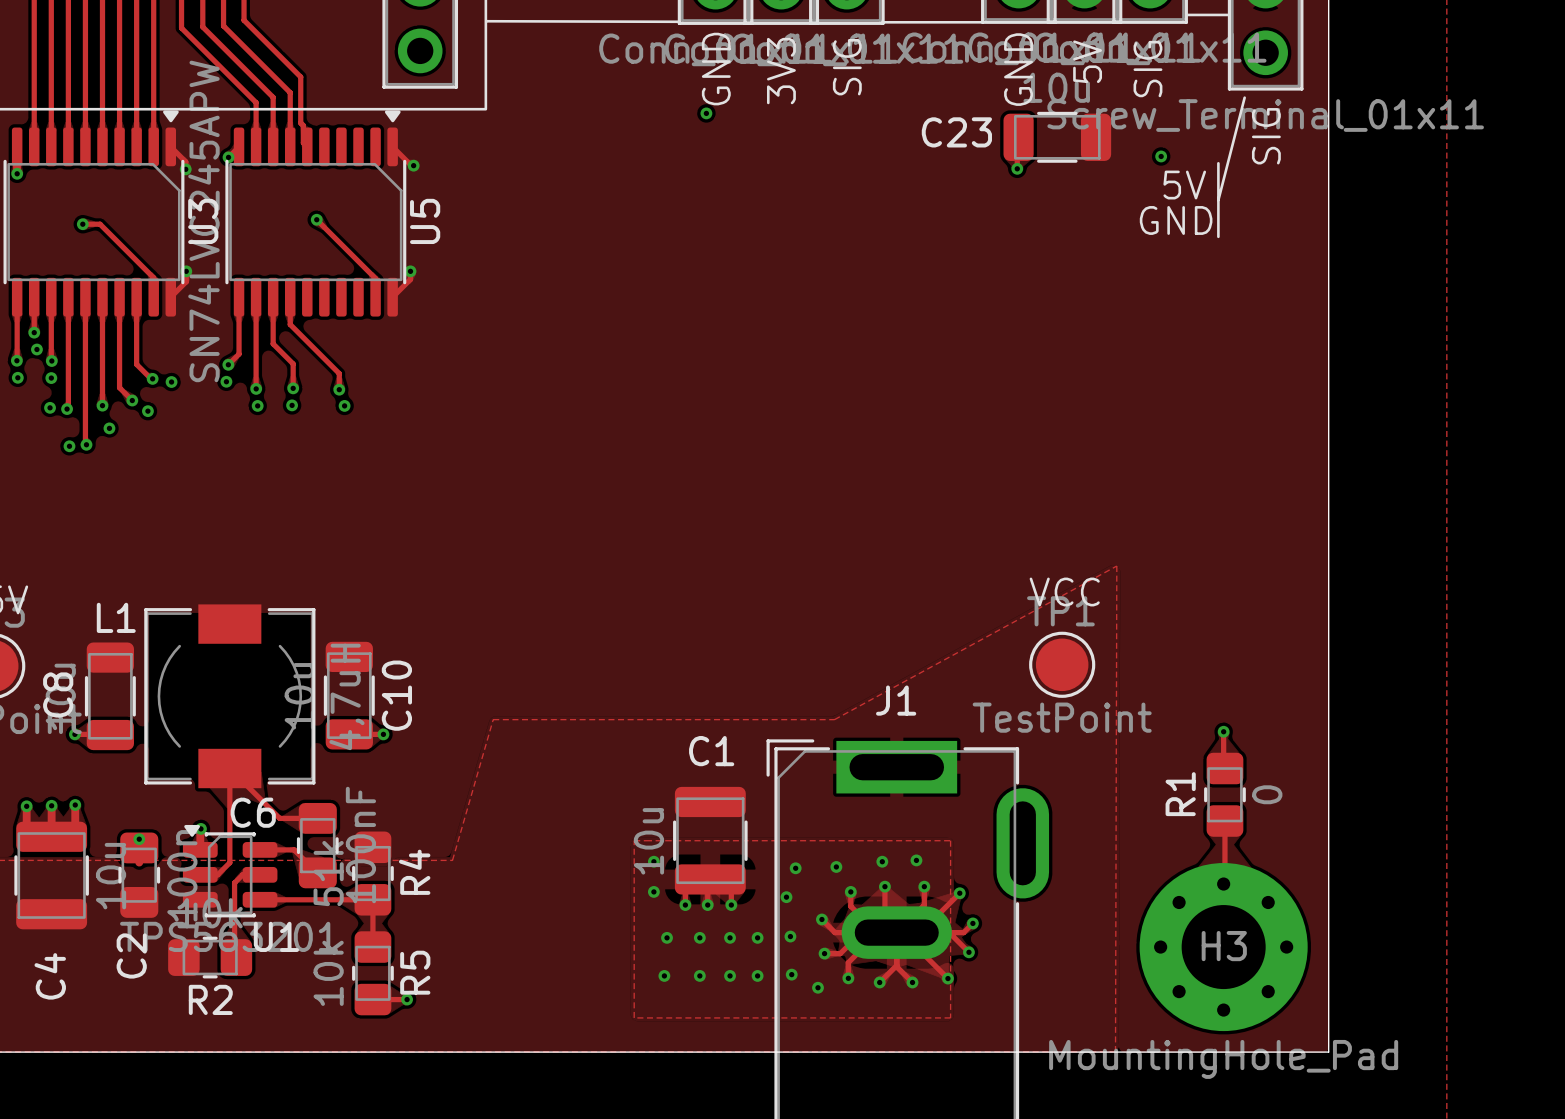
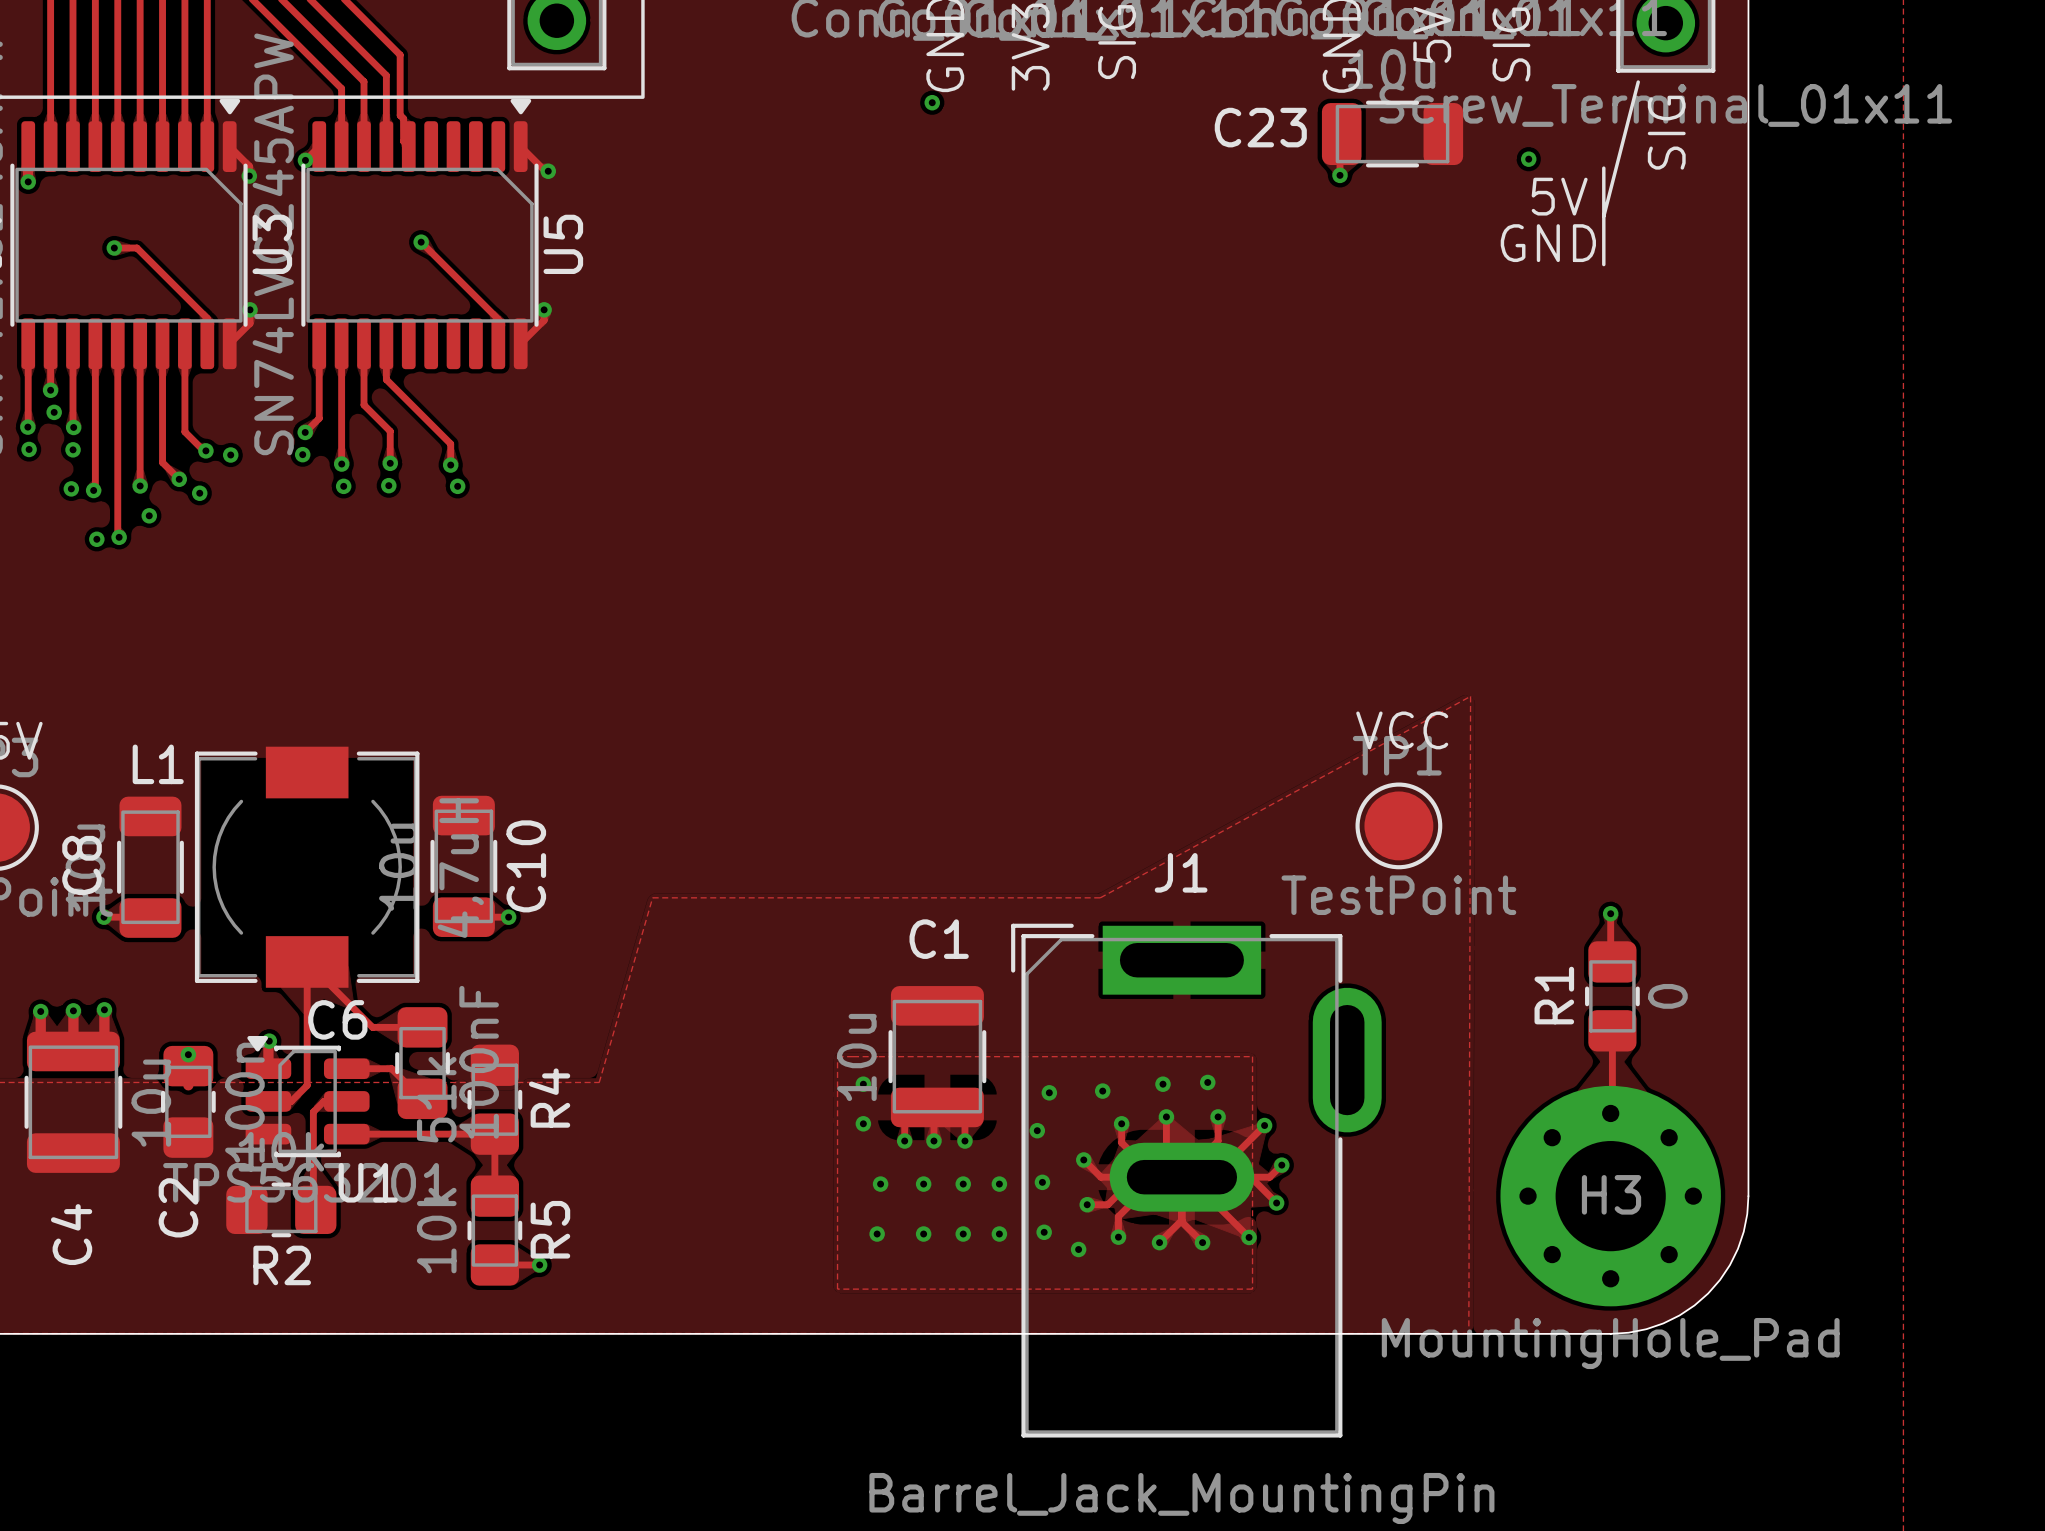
board edge: (1328, 947) (1328, 1052) (1223, 1052) -> (1748, 1196) (1743, 1231) (1737, 1248) (1729, 1265) (1708, 1293) (1694, 1305) (1663, 1323) (1646, 1329) (1610, 1333)

